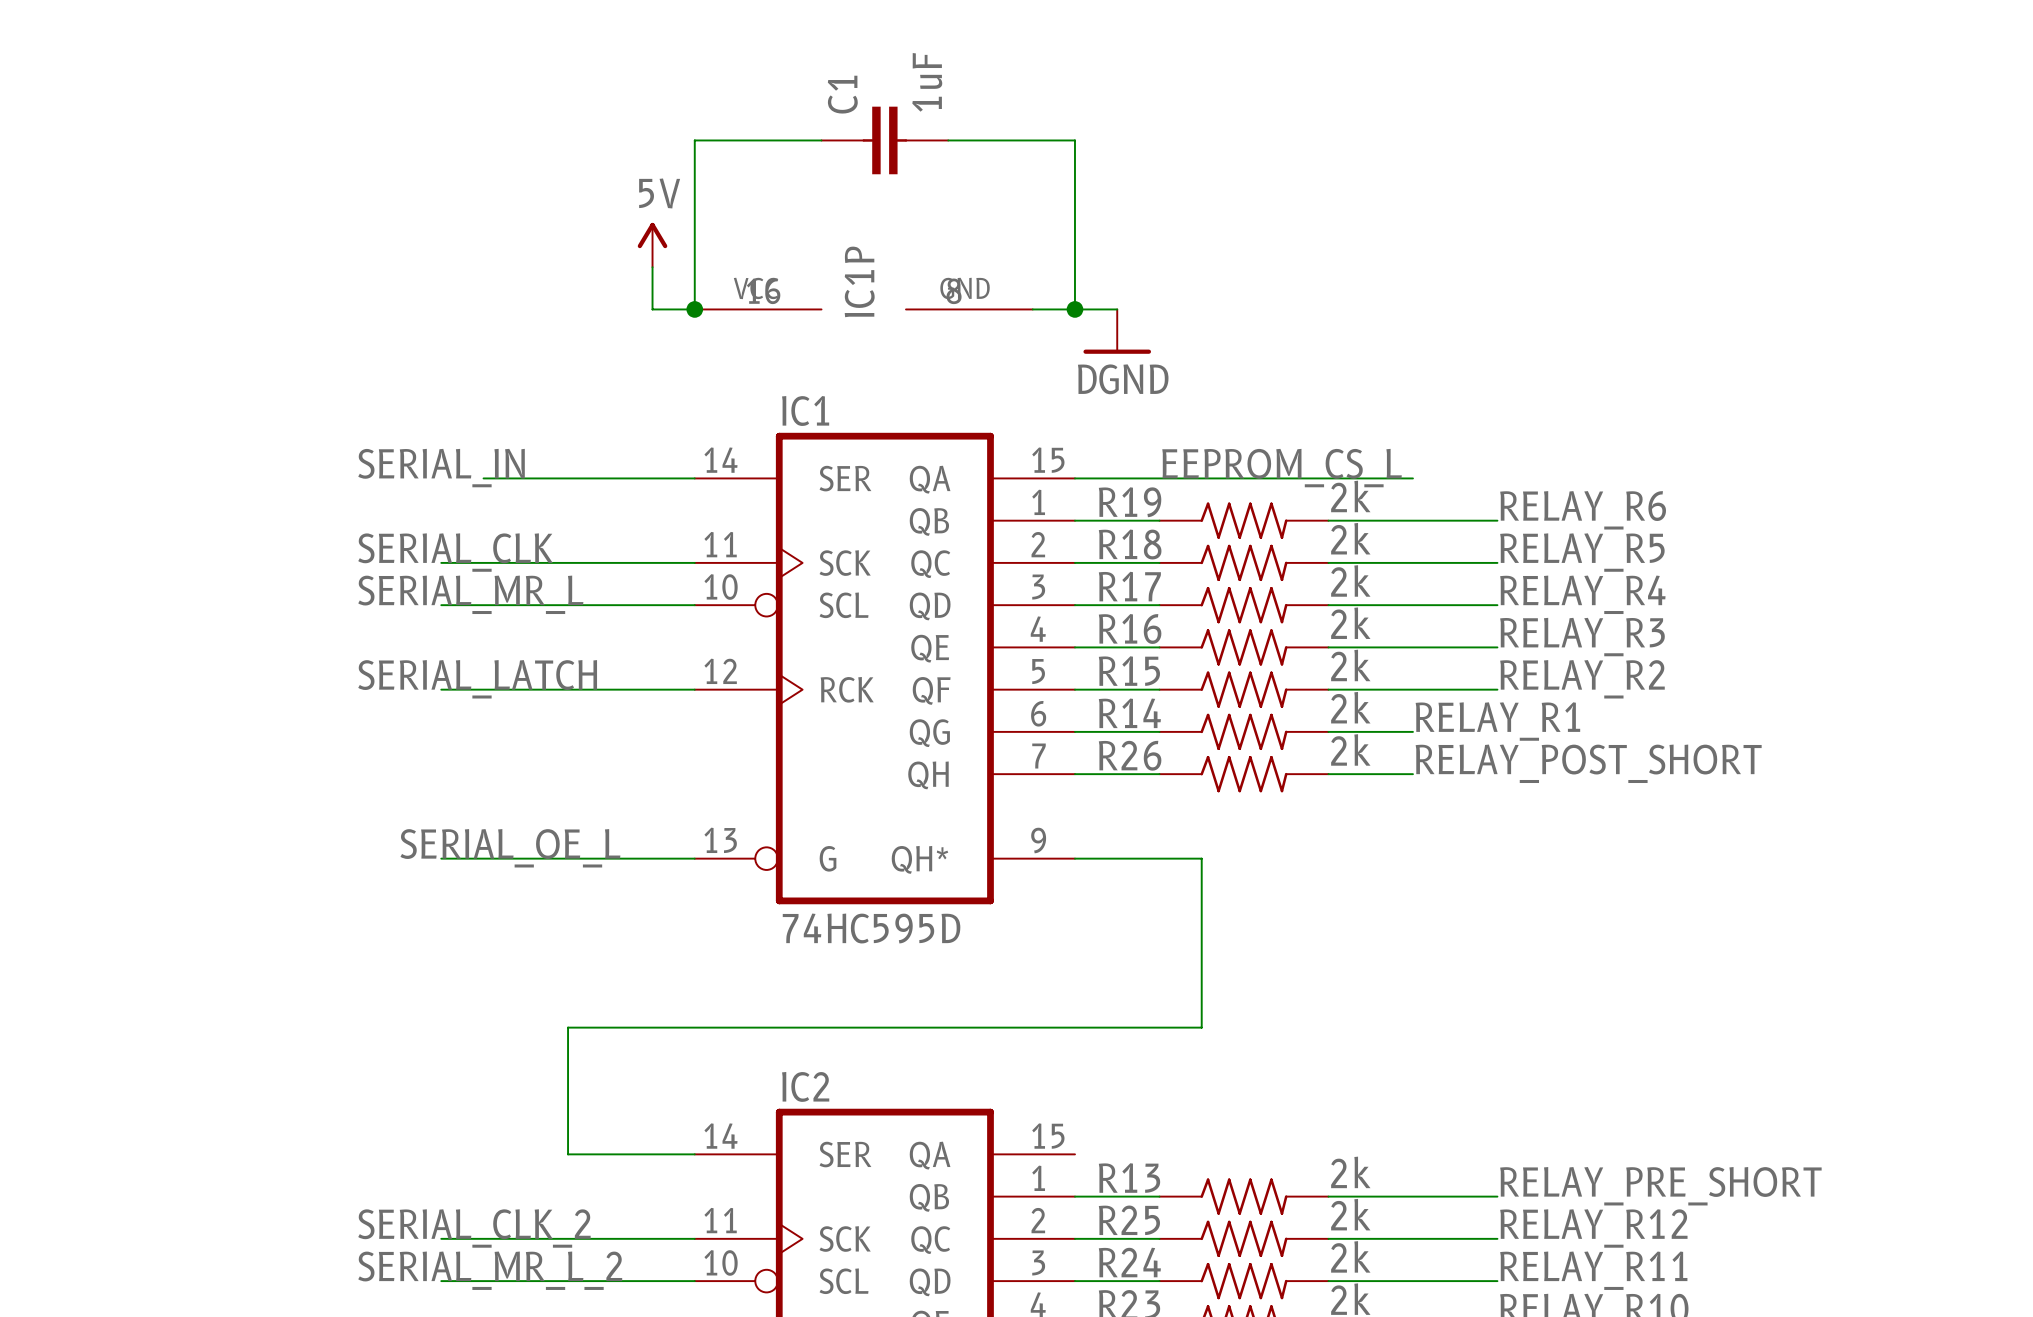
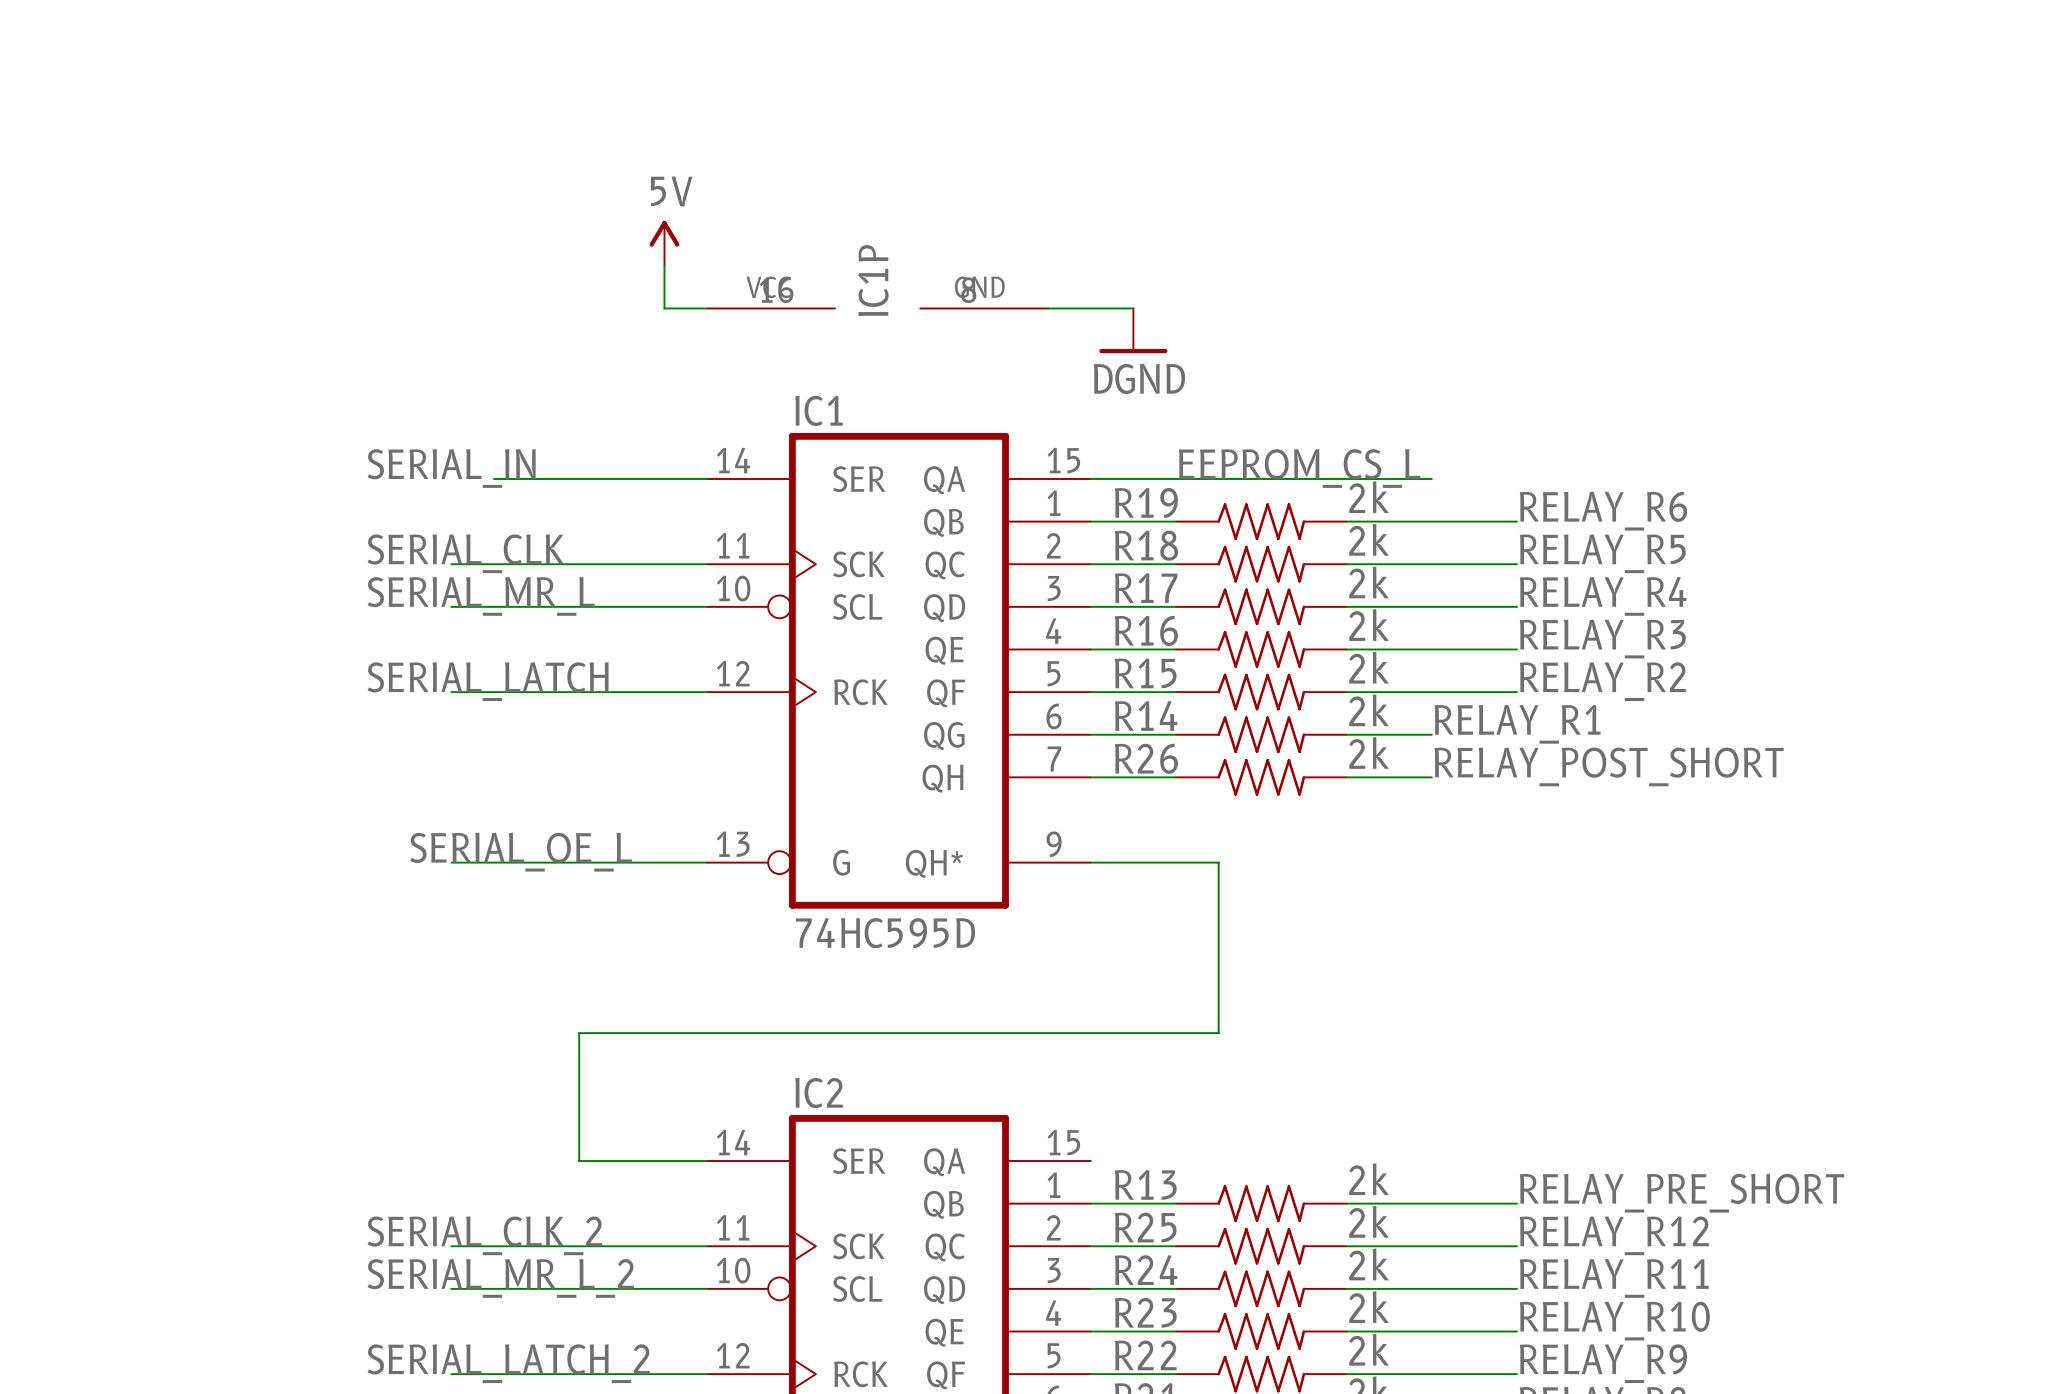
wire: (821, 140) (694, 140) (694, 309) -> none
C1: 1uF (884, 140) -> none
wire: (948, 140) (1074, 140) (1074, 309) -> none
junction: (694, 309) -> none
junction: (1074, 309) -> none

